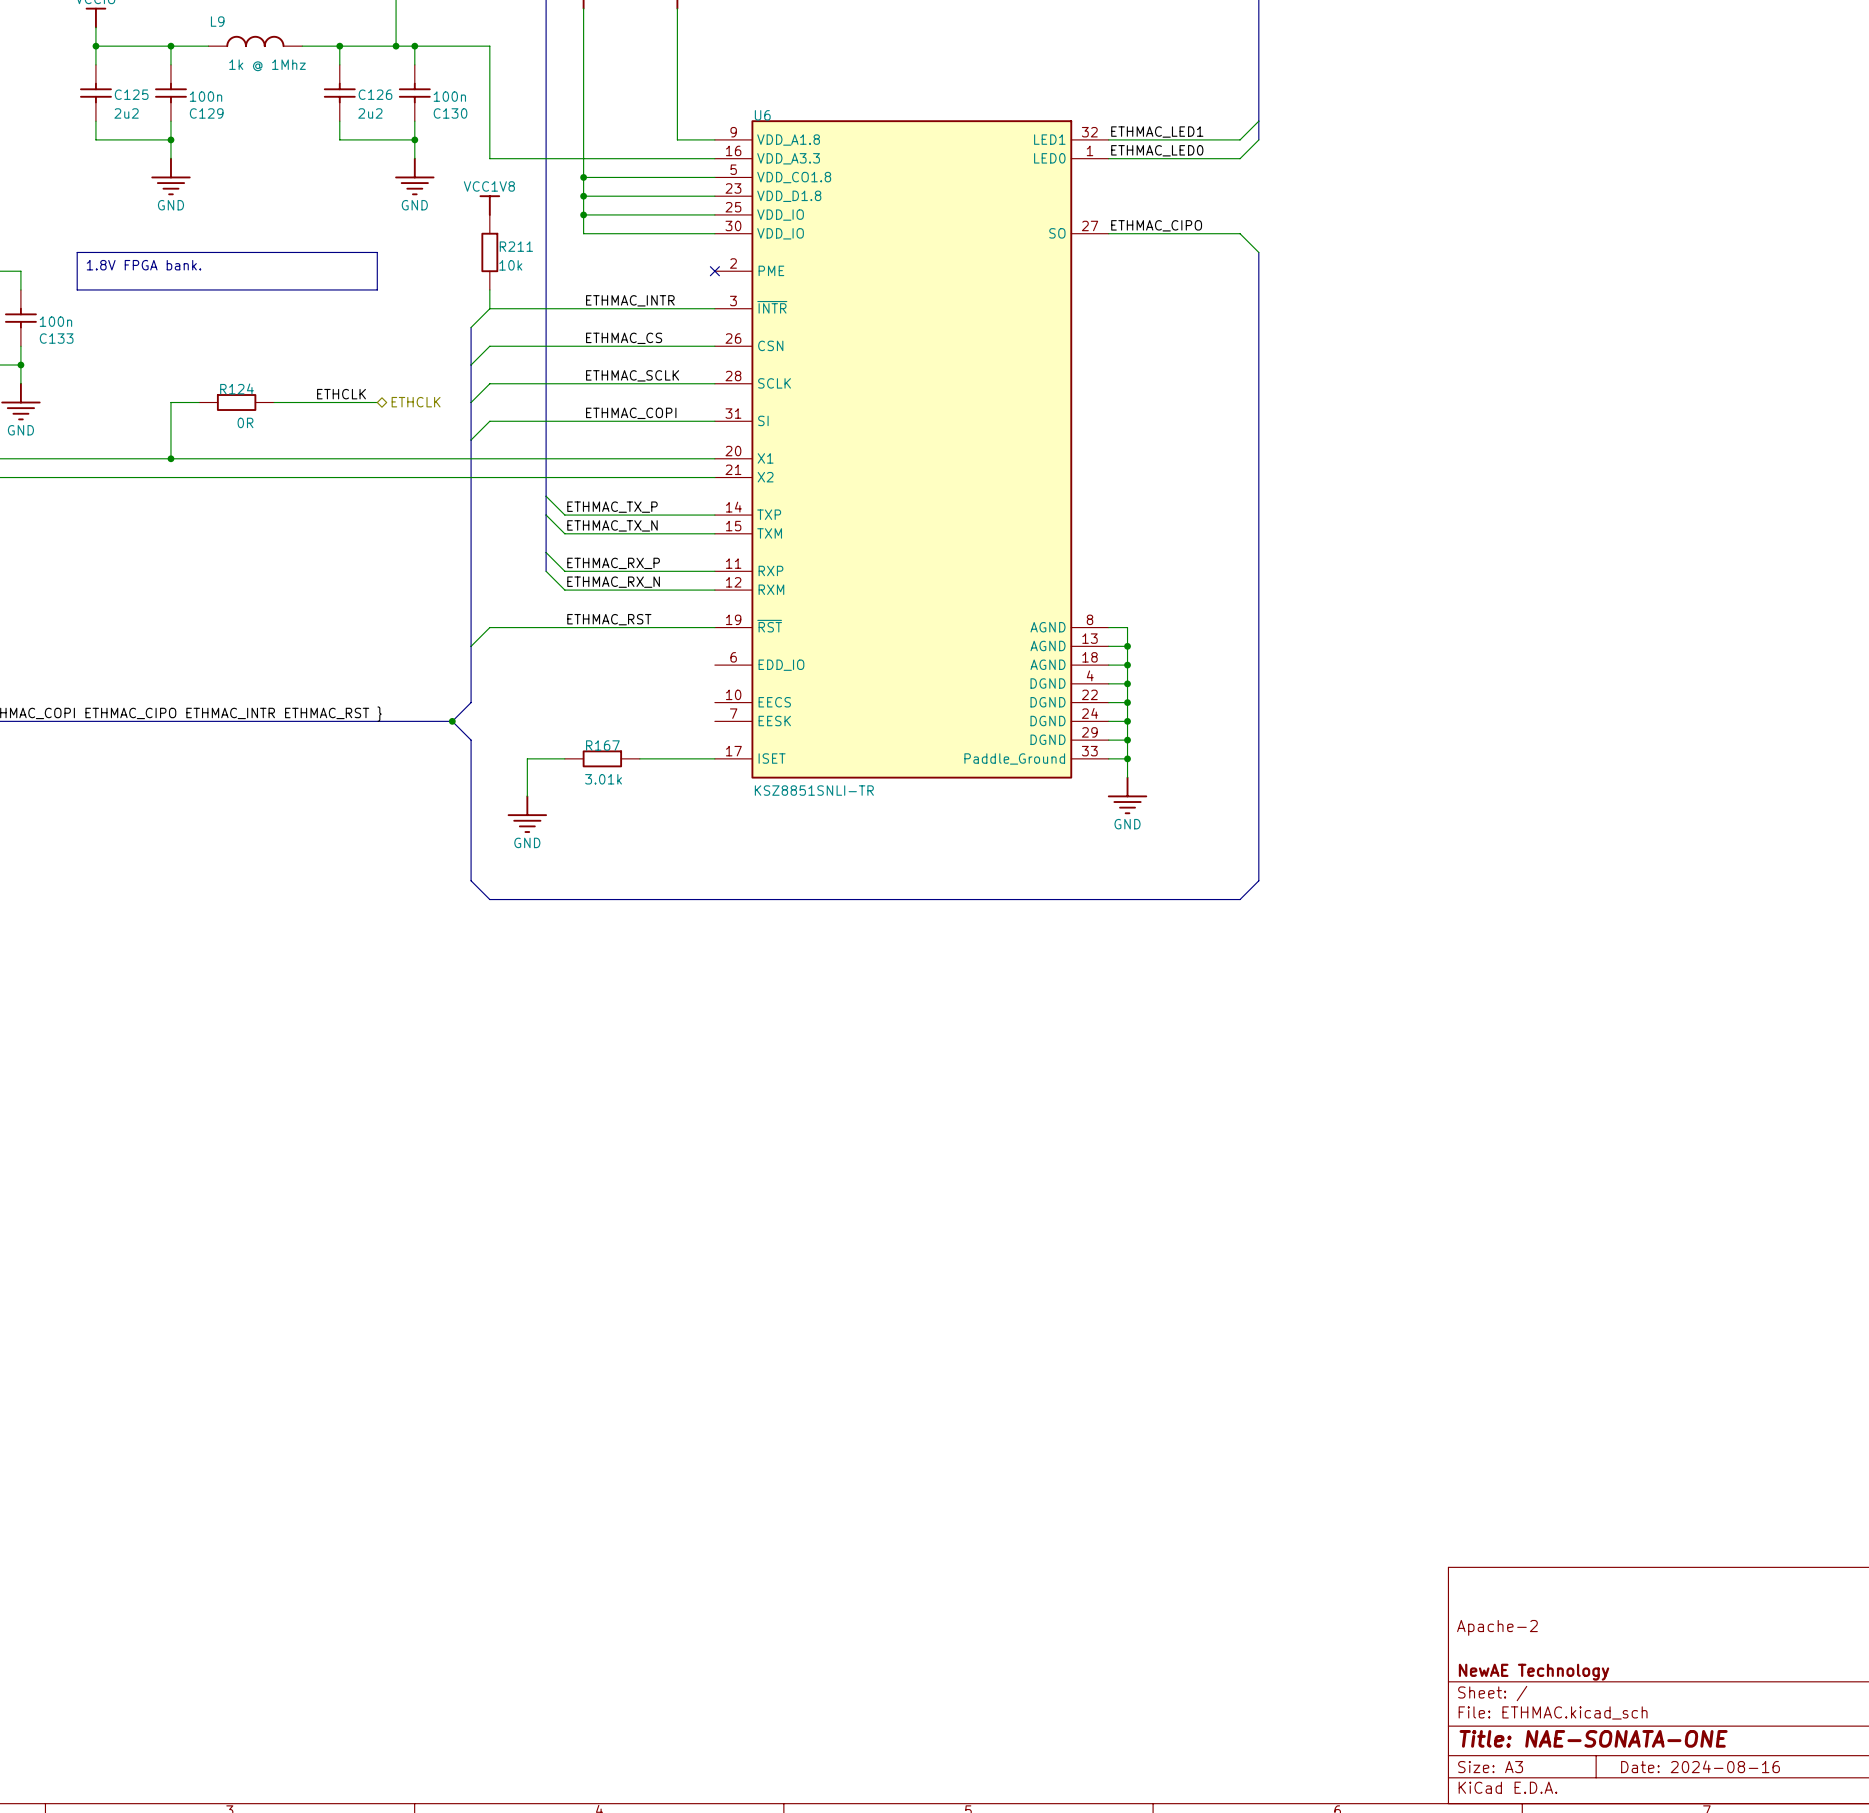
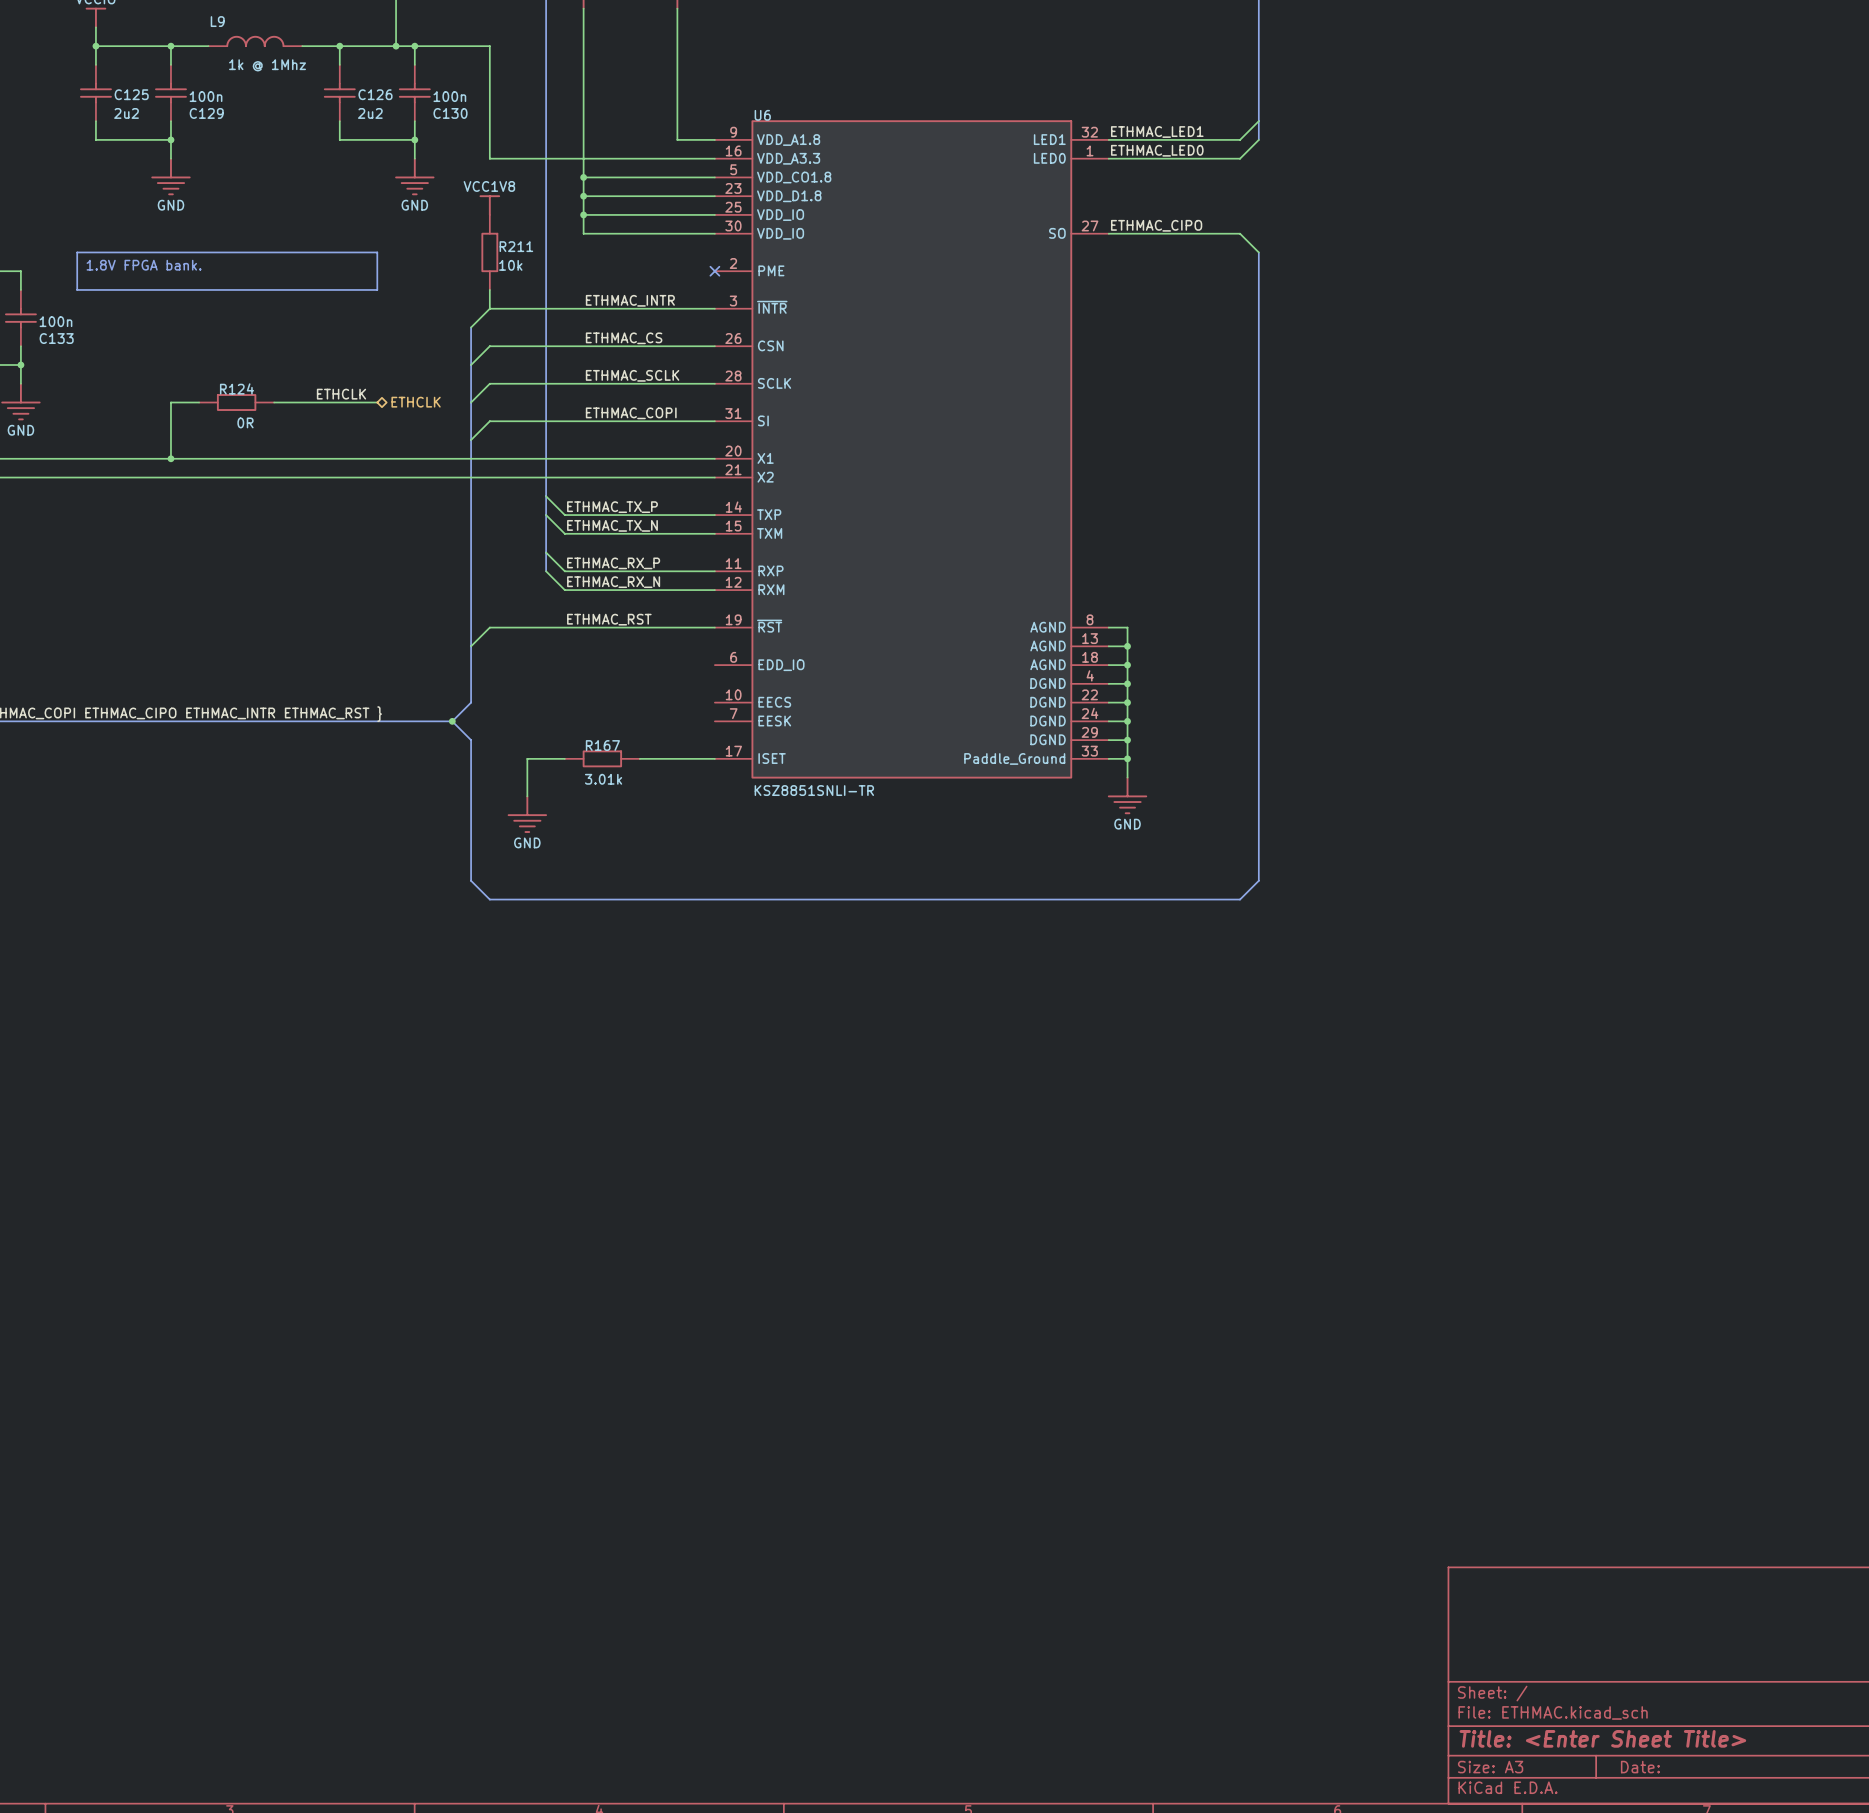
title block: Apache-2 (1497, 1627) -> none
title block: NewAE Technology (1534, 1672) -> none
title block: Title: NAE-SONATA-ONE (1593, 1738) -> Title: <Enter Sheet Title> (1602, 1738)
title block: Date: 2024-08-16 (1700, 1766) -> Date: (1640, 1767)

